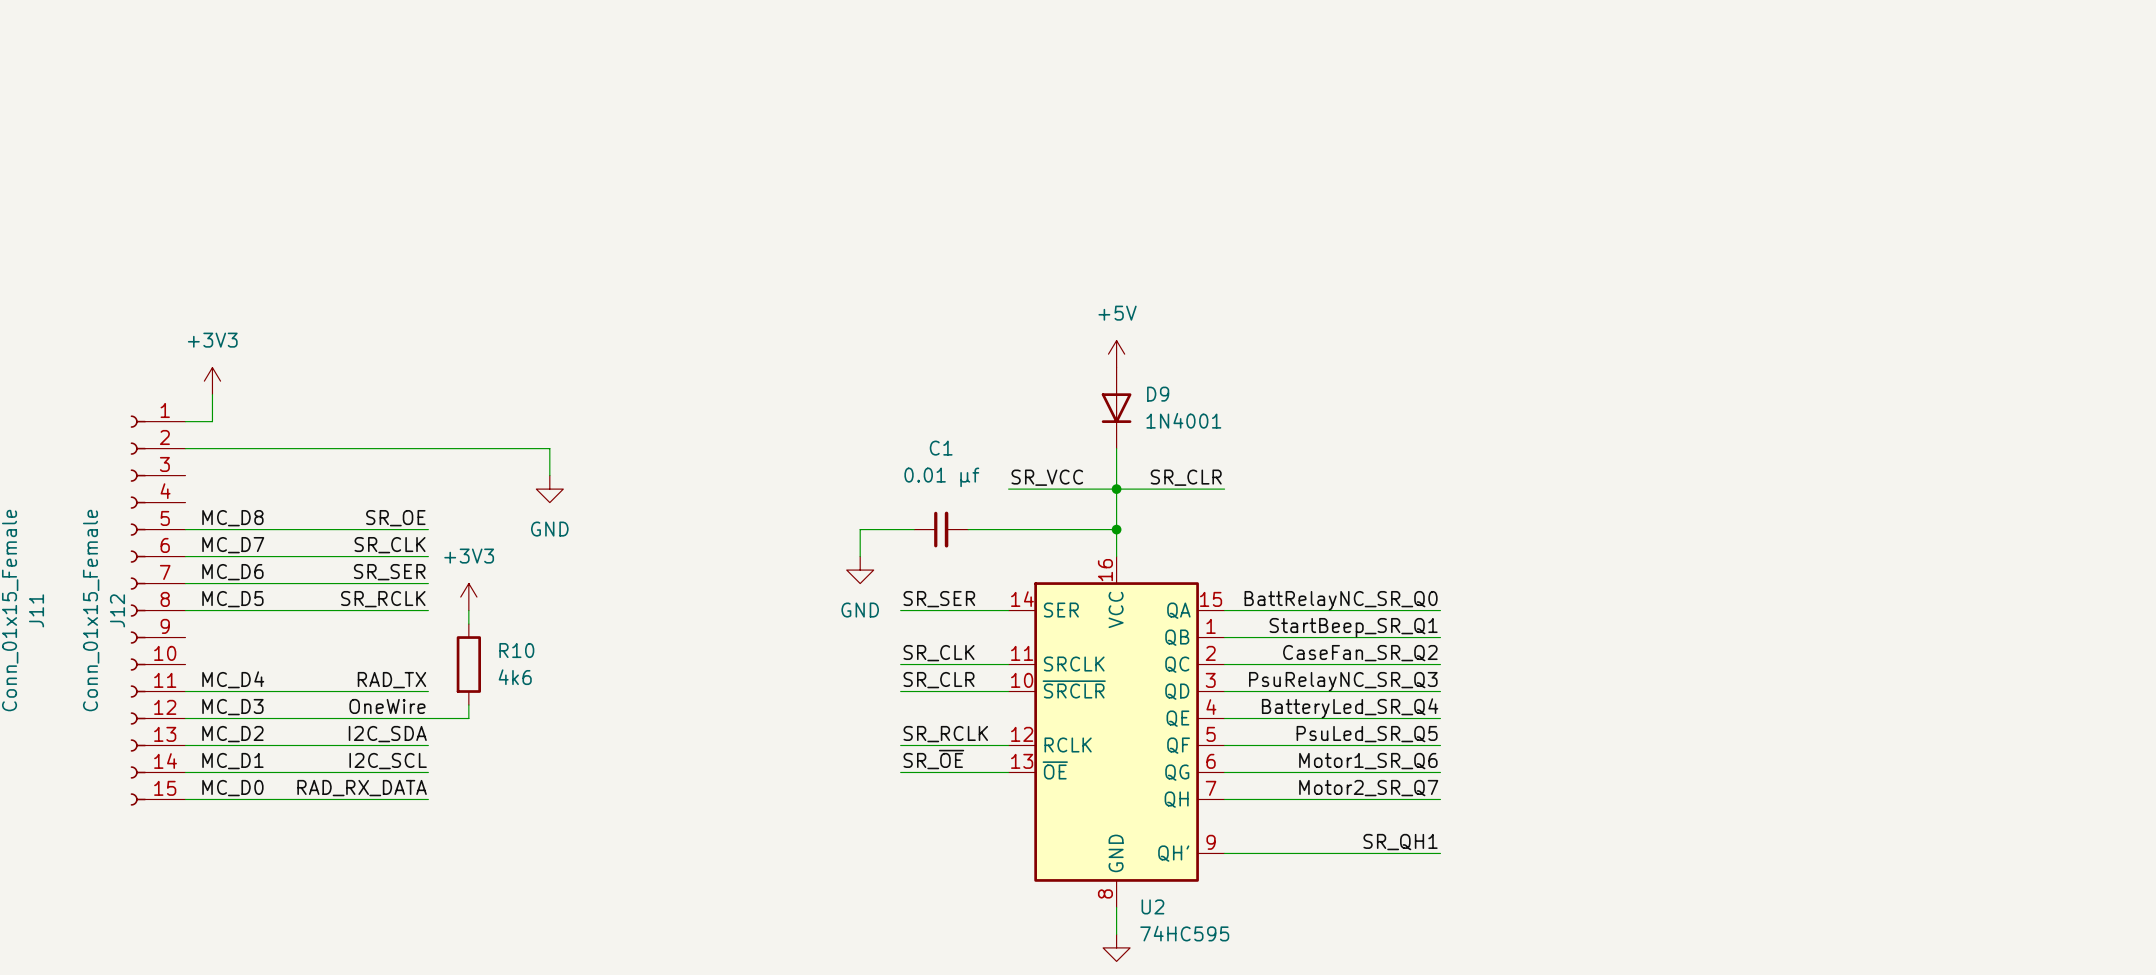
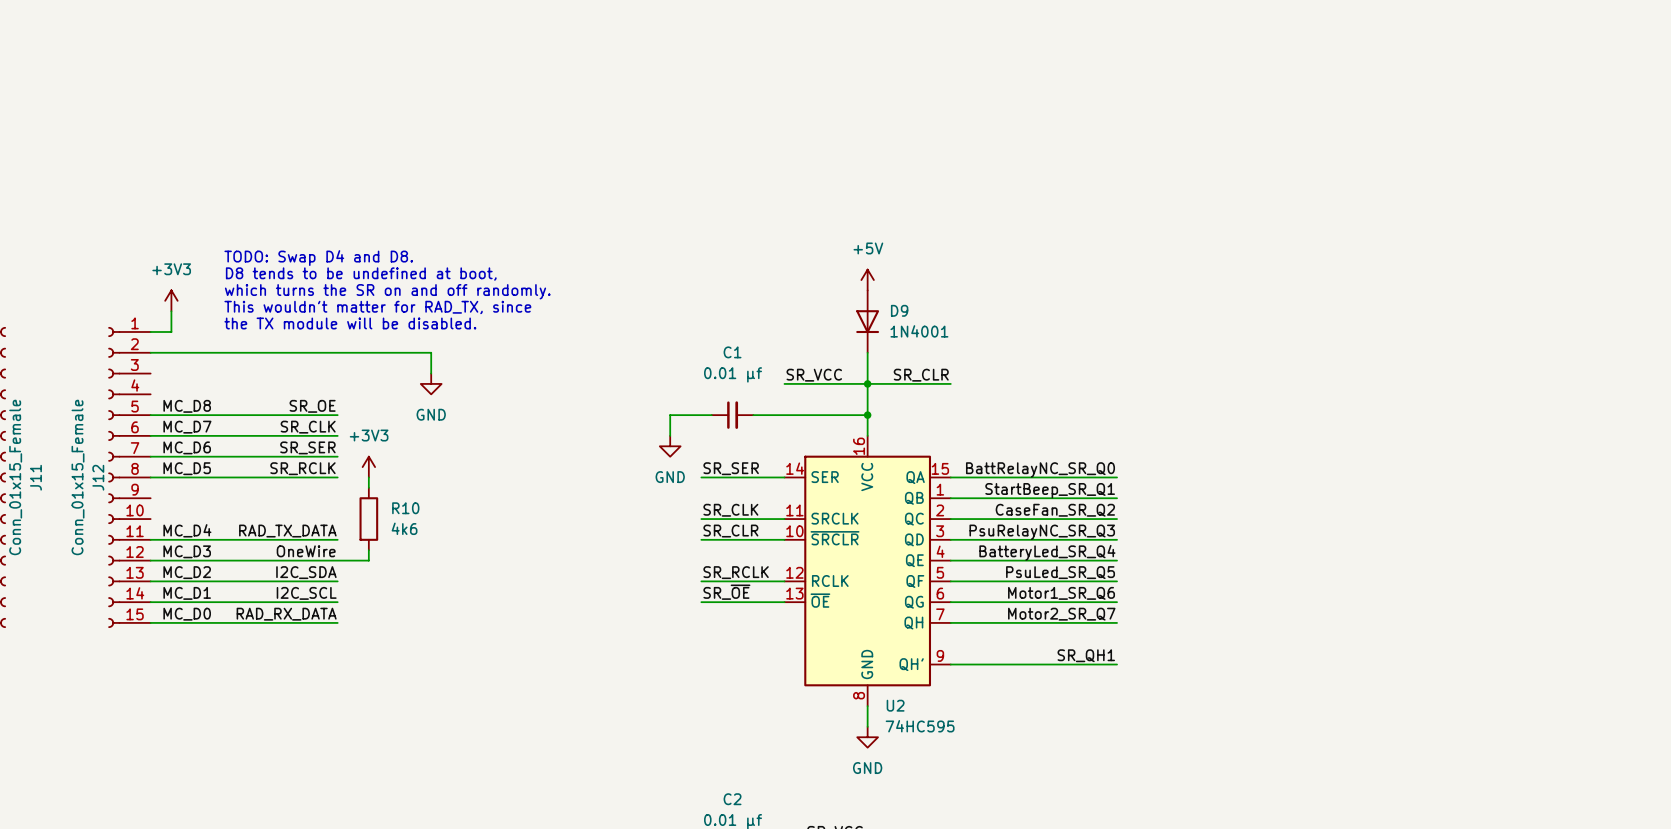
text: none -> TODO: Swap D4 and D8. (318, 258)
text: none -> D8 tends to be undefined at boot, (361, 274)
text: none -> which turns the SR on and off randomly. (387, 291)
text: none -> This wouldn't matter for RAD_TX, since (377, 307)
text: none -> the TX module will be disabled. (350, 323)
label: RAD_TX (391, 680) -> RAD_TX_DATA (287, 531)

